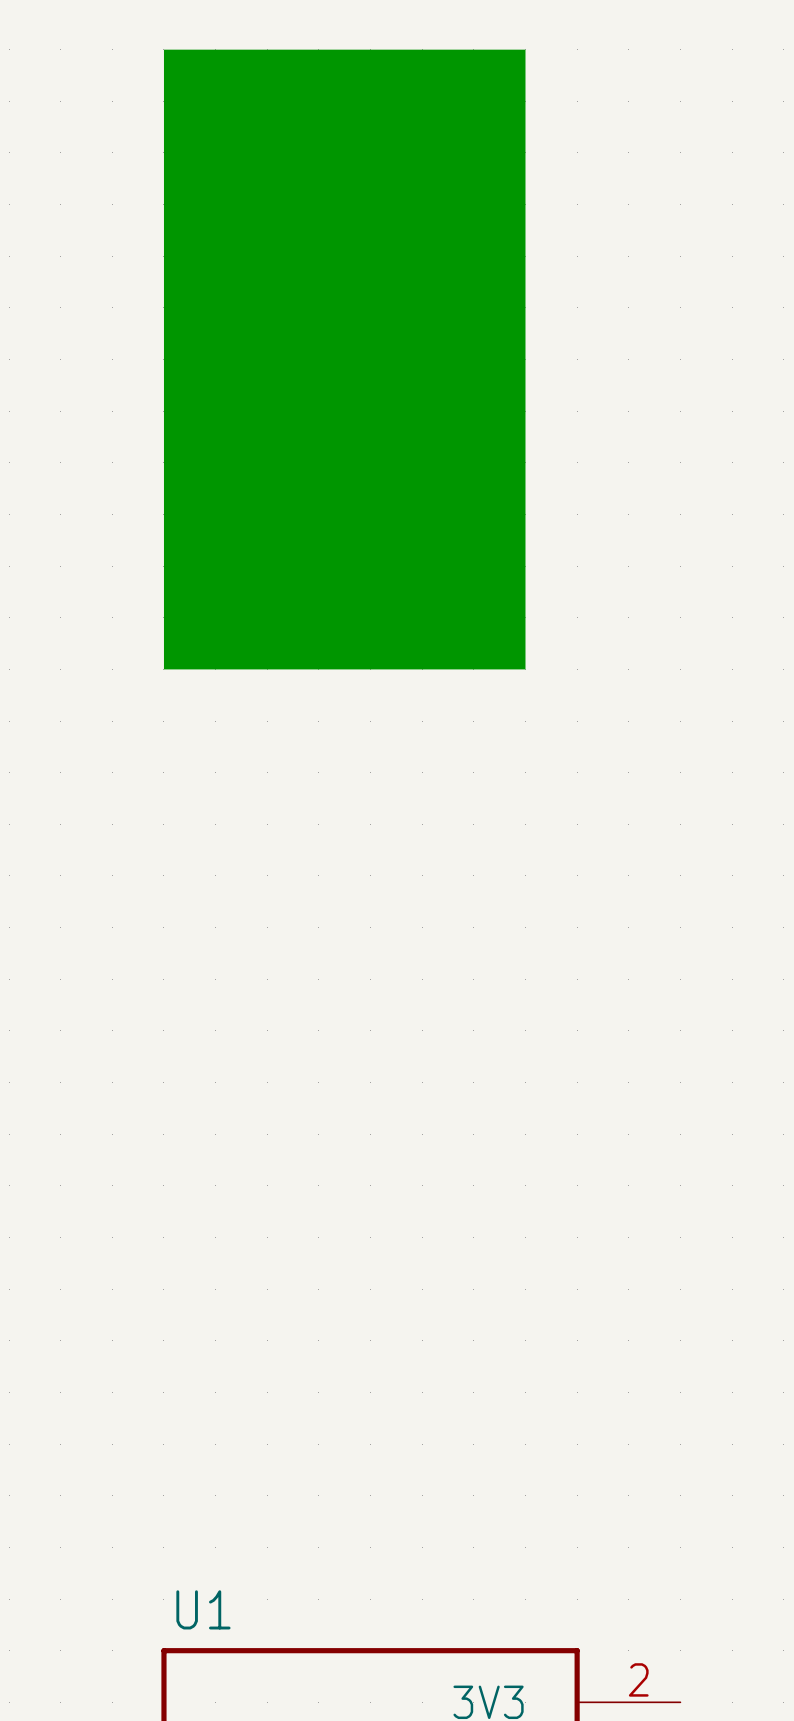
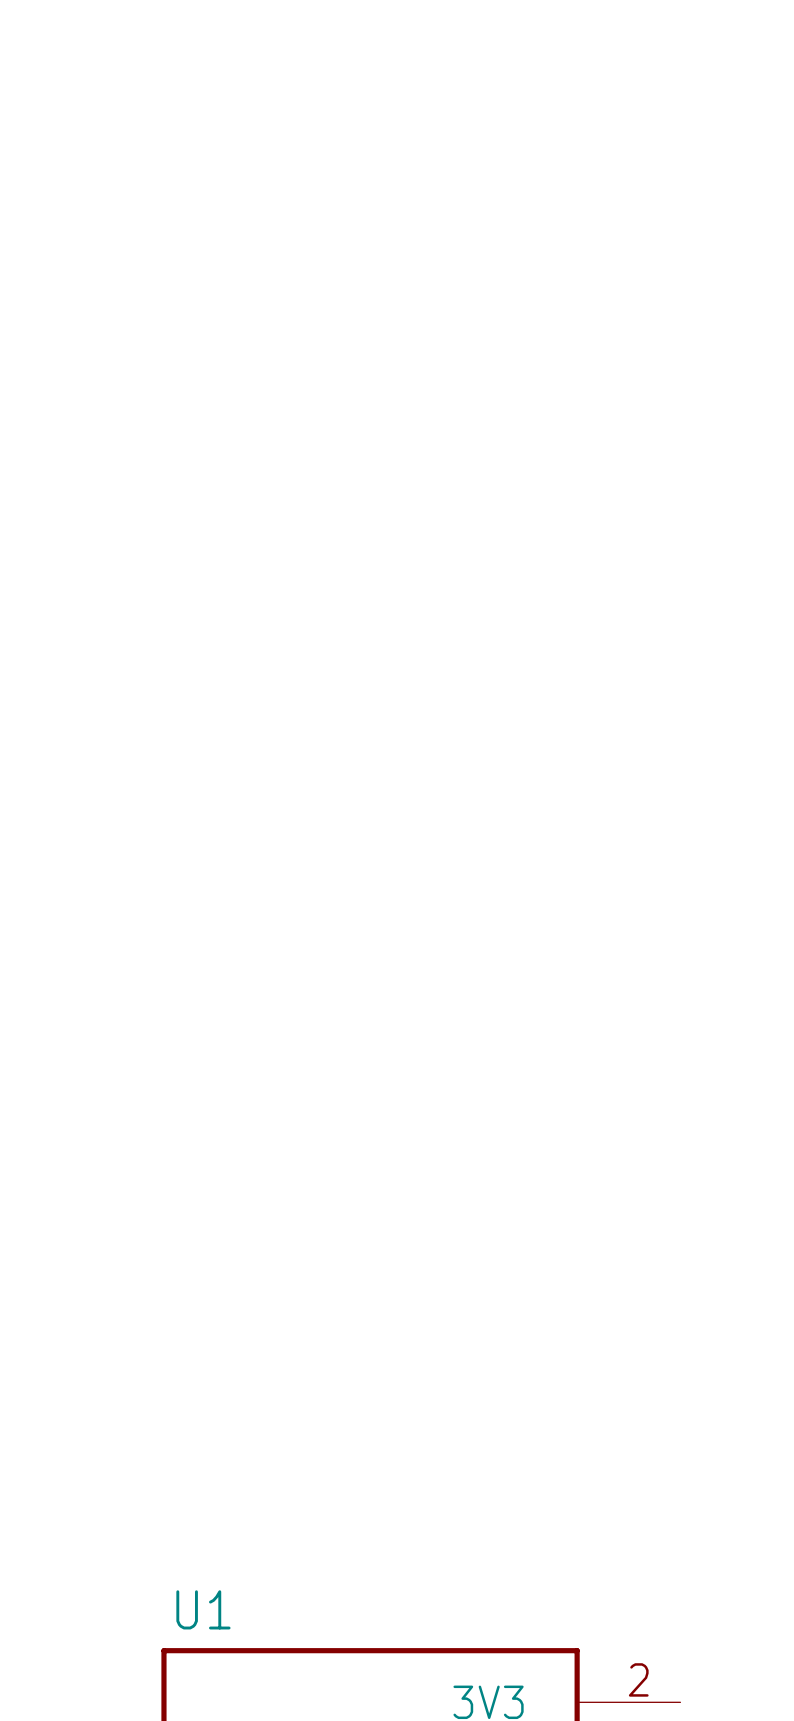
drawing: [163, 49, 526, 670] -> none

